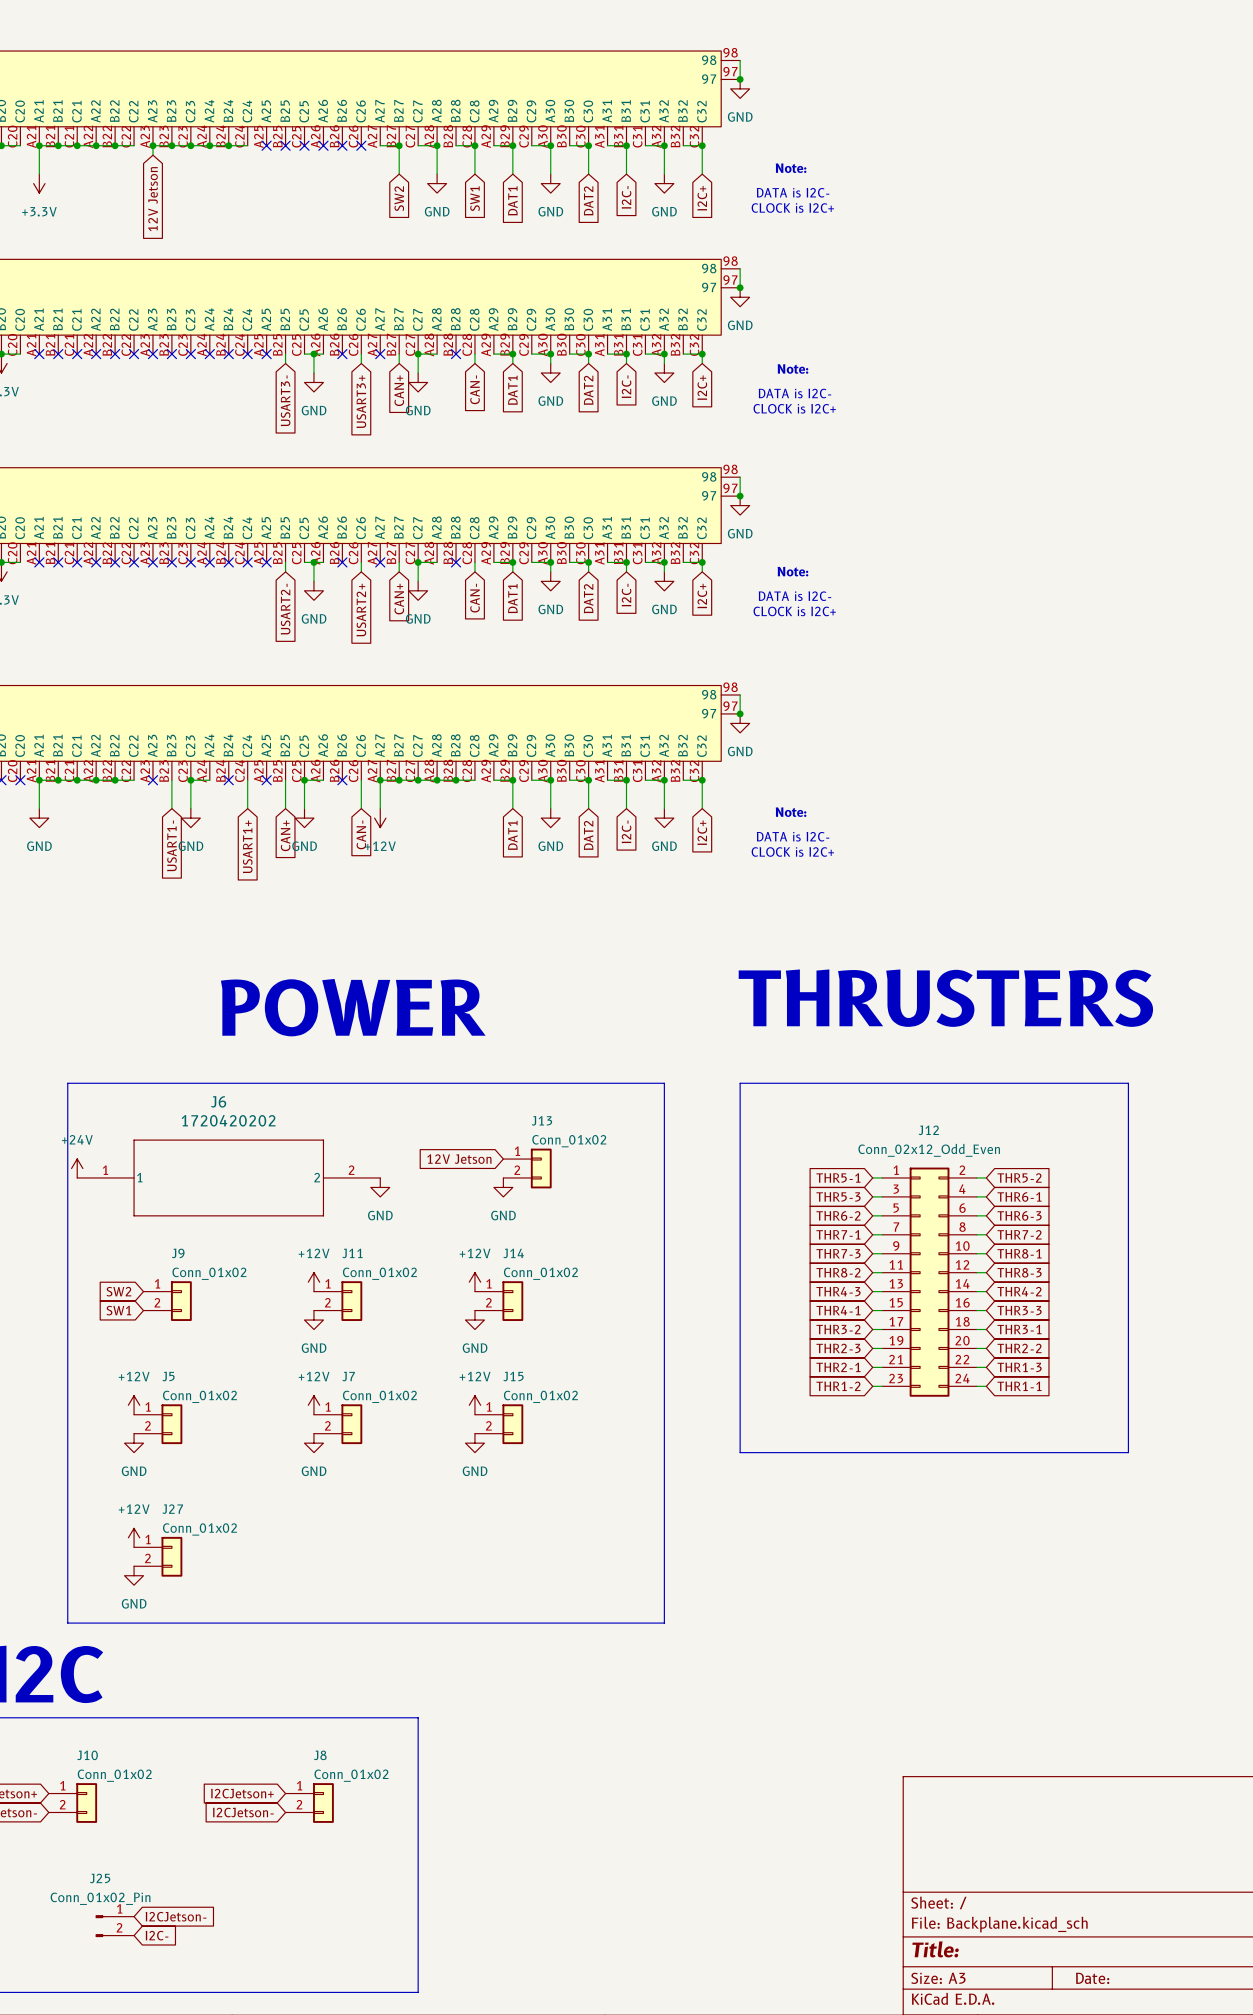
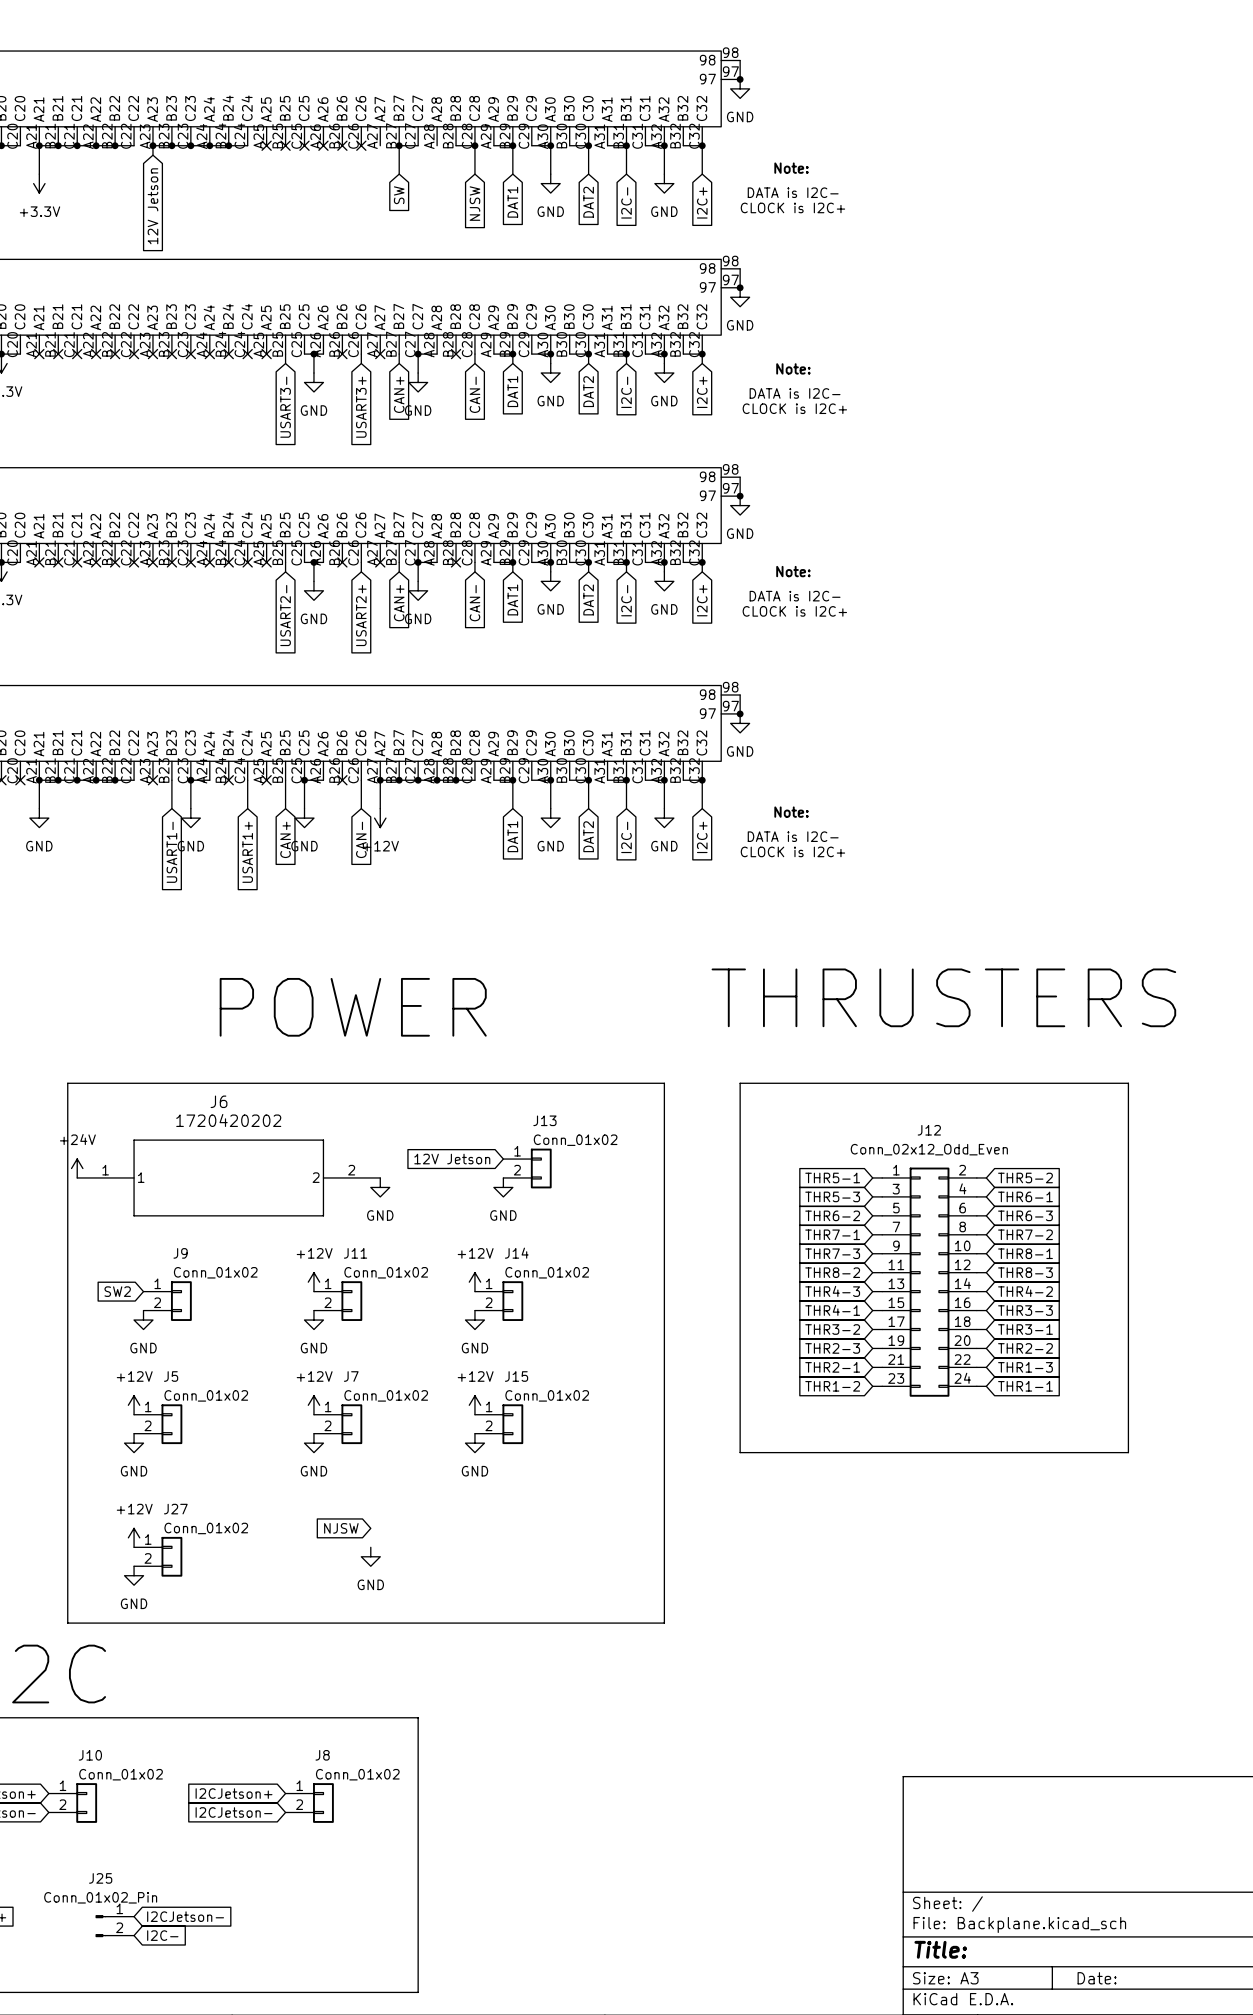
wire: (380, 145) (399, 145) -> (418, 145) (399, 145)
wire: (418, 145) (437, 145) (437, 174) -> none
junction: (437, 145) -> none
power symbol: GND (437, 183) -> none
global label: SW2 (399, 198) -> SW (399, 195)
global label: SW1 (475, 198) -> NJSW (474, 203)
global label: SW1 (118, 1310) -> none
power symbol: none -> GND (143, 1320)
global label: none -> NJSW (341, 1528)
power symbol: none -> GND (370, 1556)

